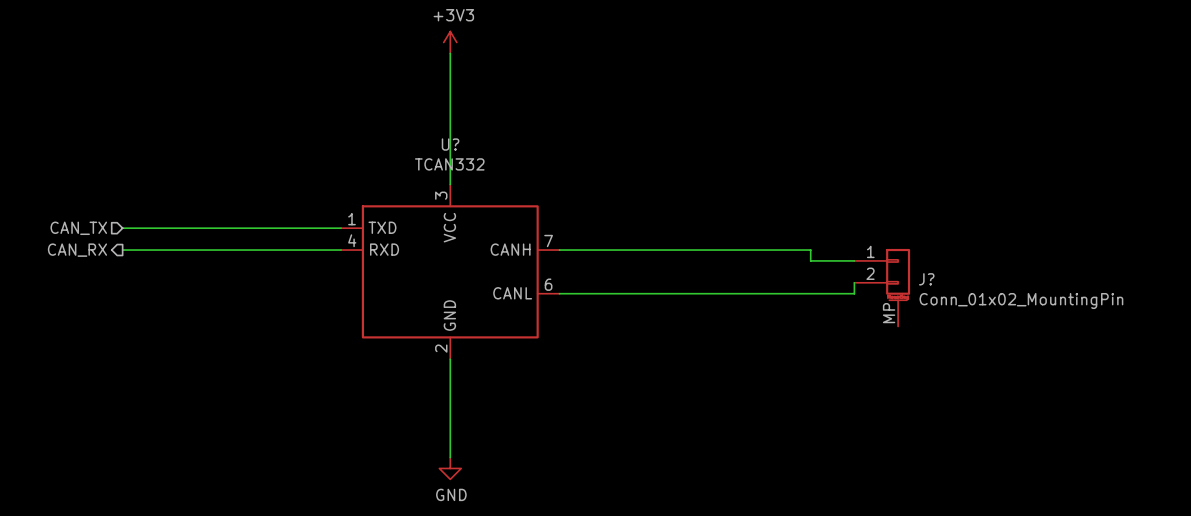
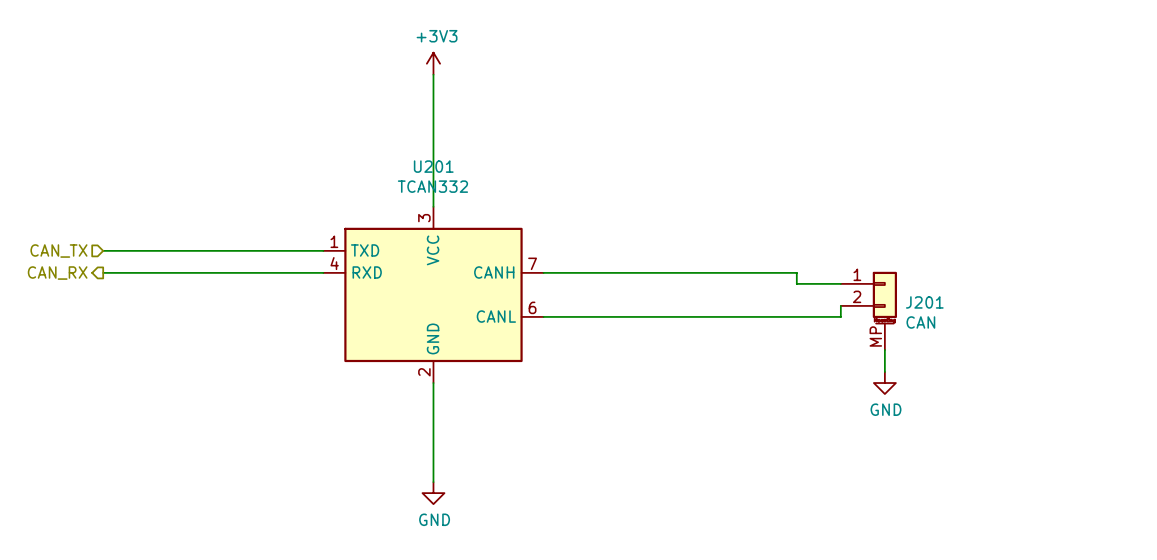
U? name: U? (450, 144) -> U201 (433, 166)
J? name: J? (926, 279) -> J201 (924, 302)
J? value: Conn_01x02_MountingPin (1021, 301) -> CAN (920, 322)
wire: none -> (884, 349) (884, 372)
power symbol: none -> GND (884, 383)

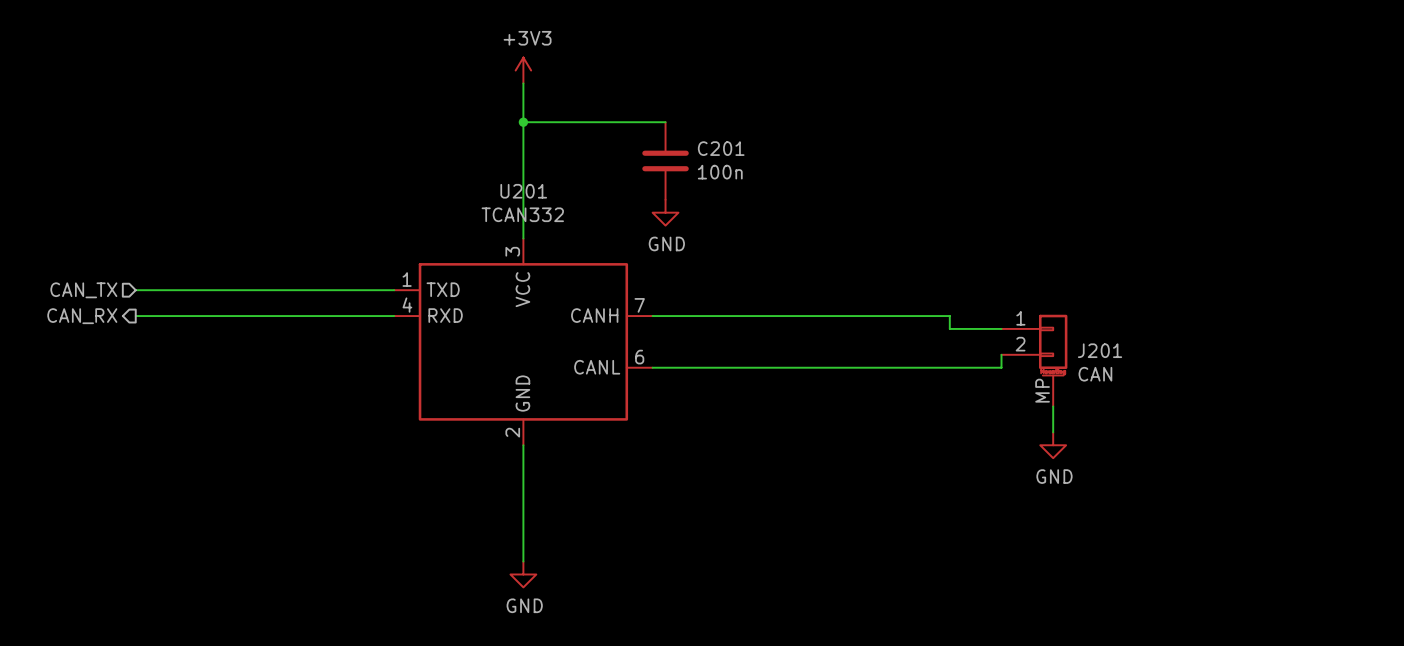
wire: none -> (523, 122) (665, 122)
junction: none -> (523, 122)
C201: none -> 100n (665, 160)
power symbol: none -> GND (665, 212)

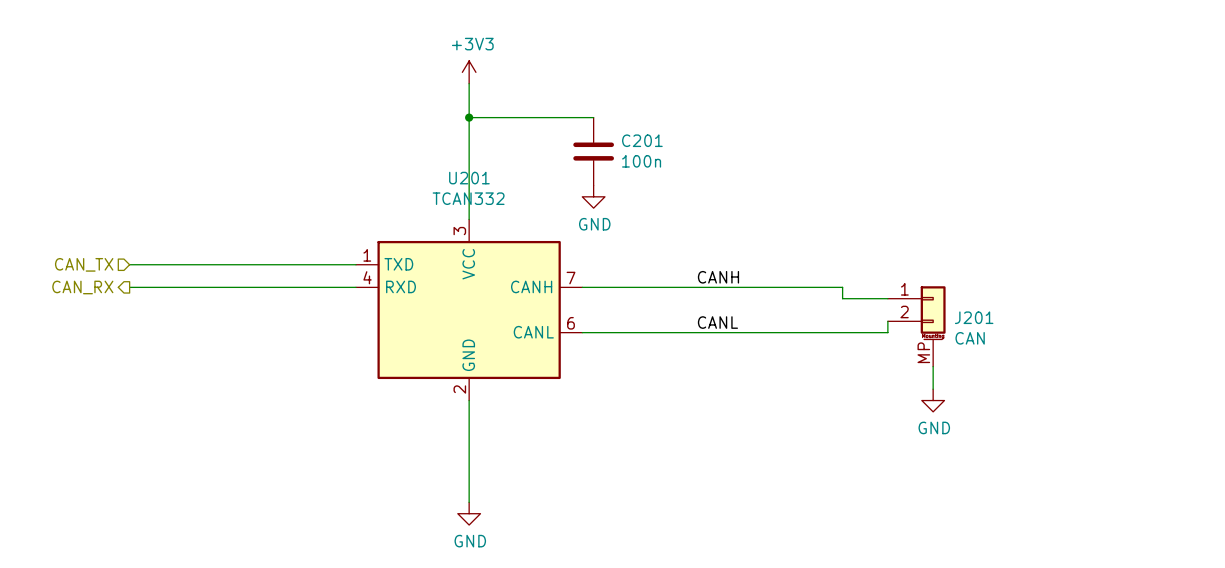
label: none -> CANH (718, 277)
label: none -> CANL (717, 322)

